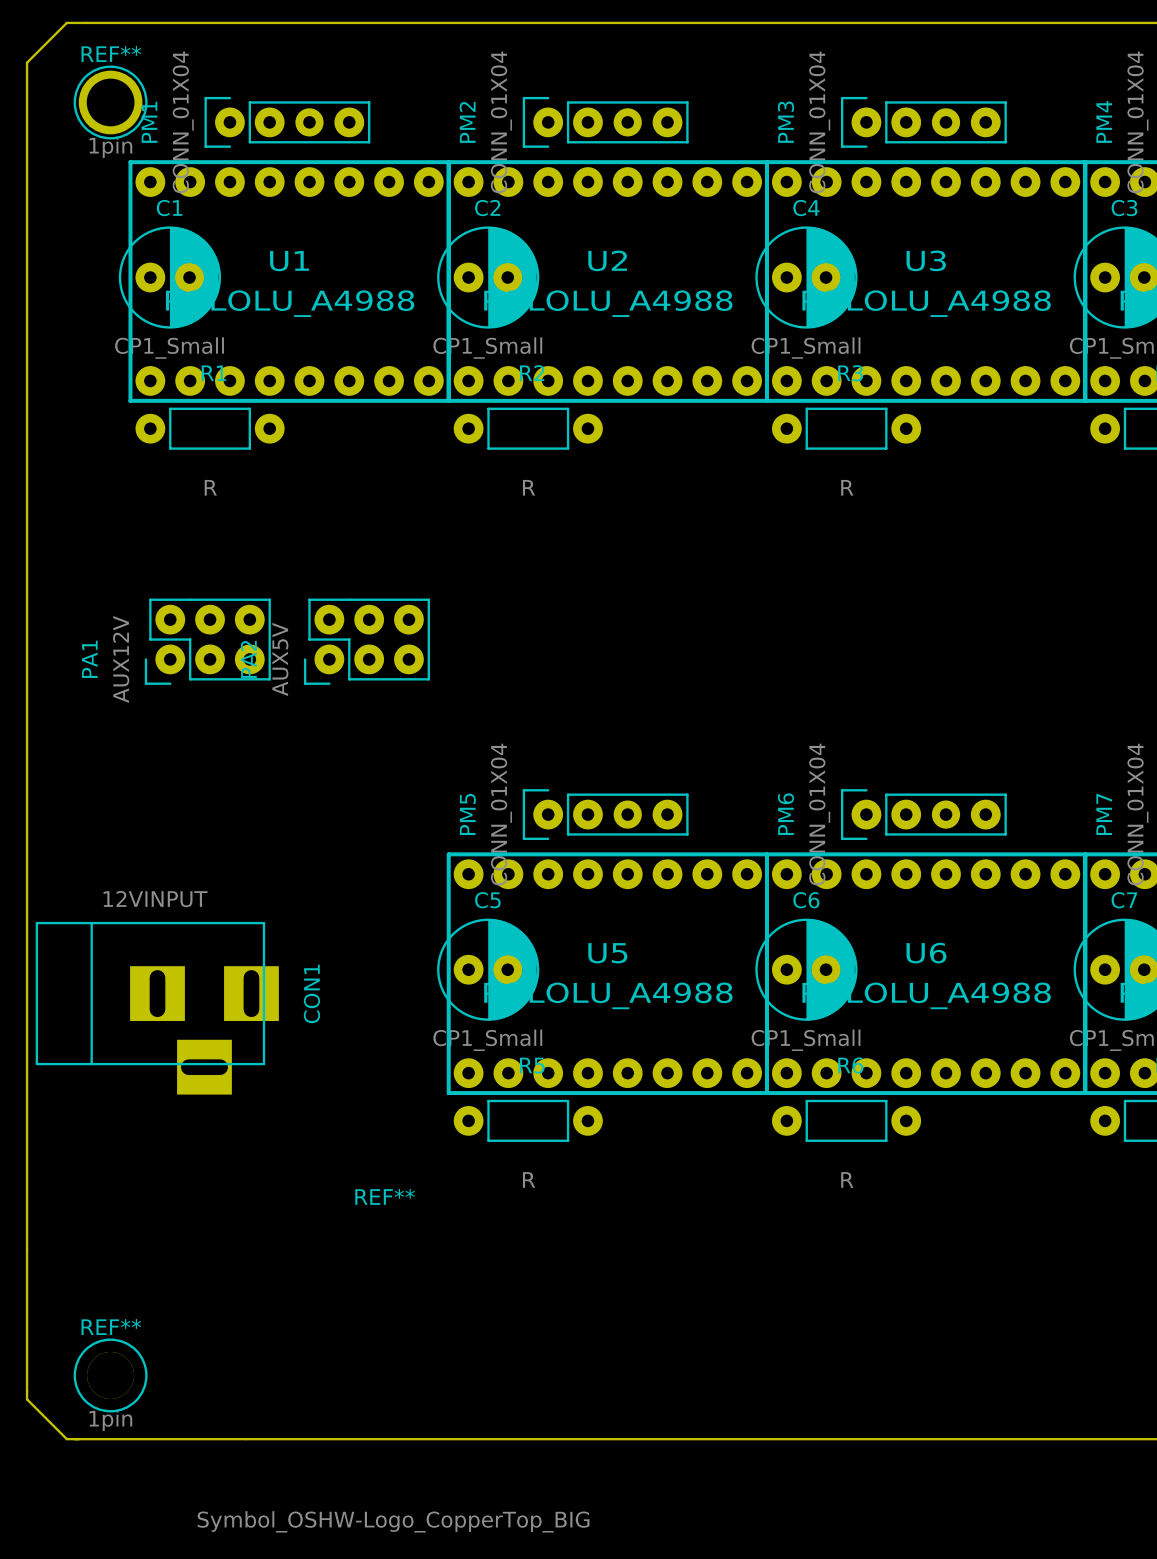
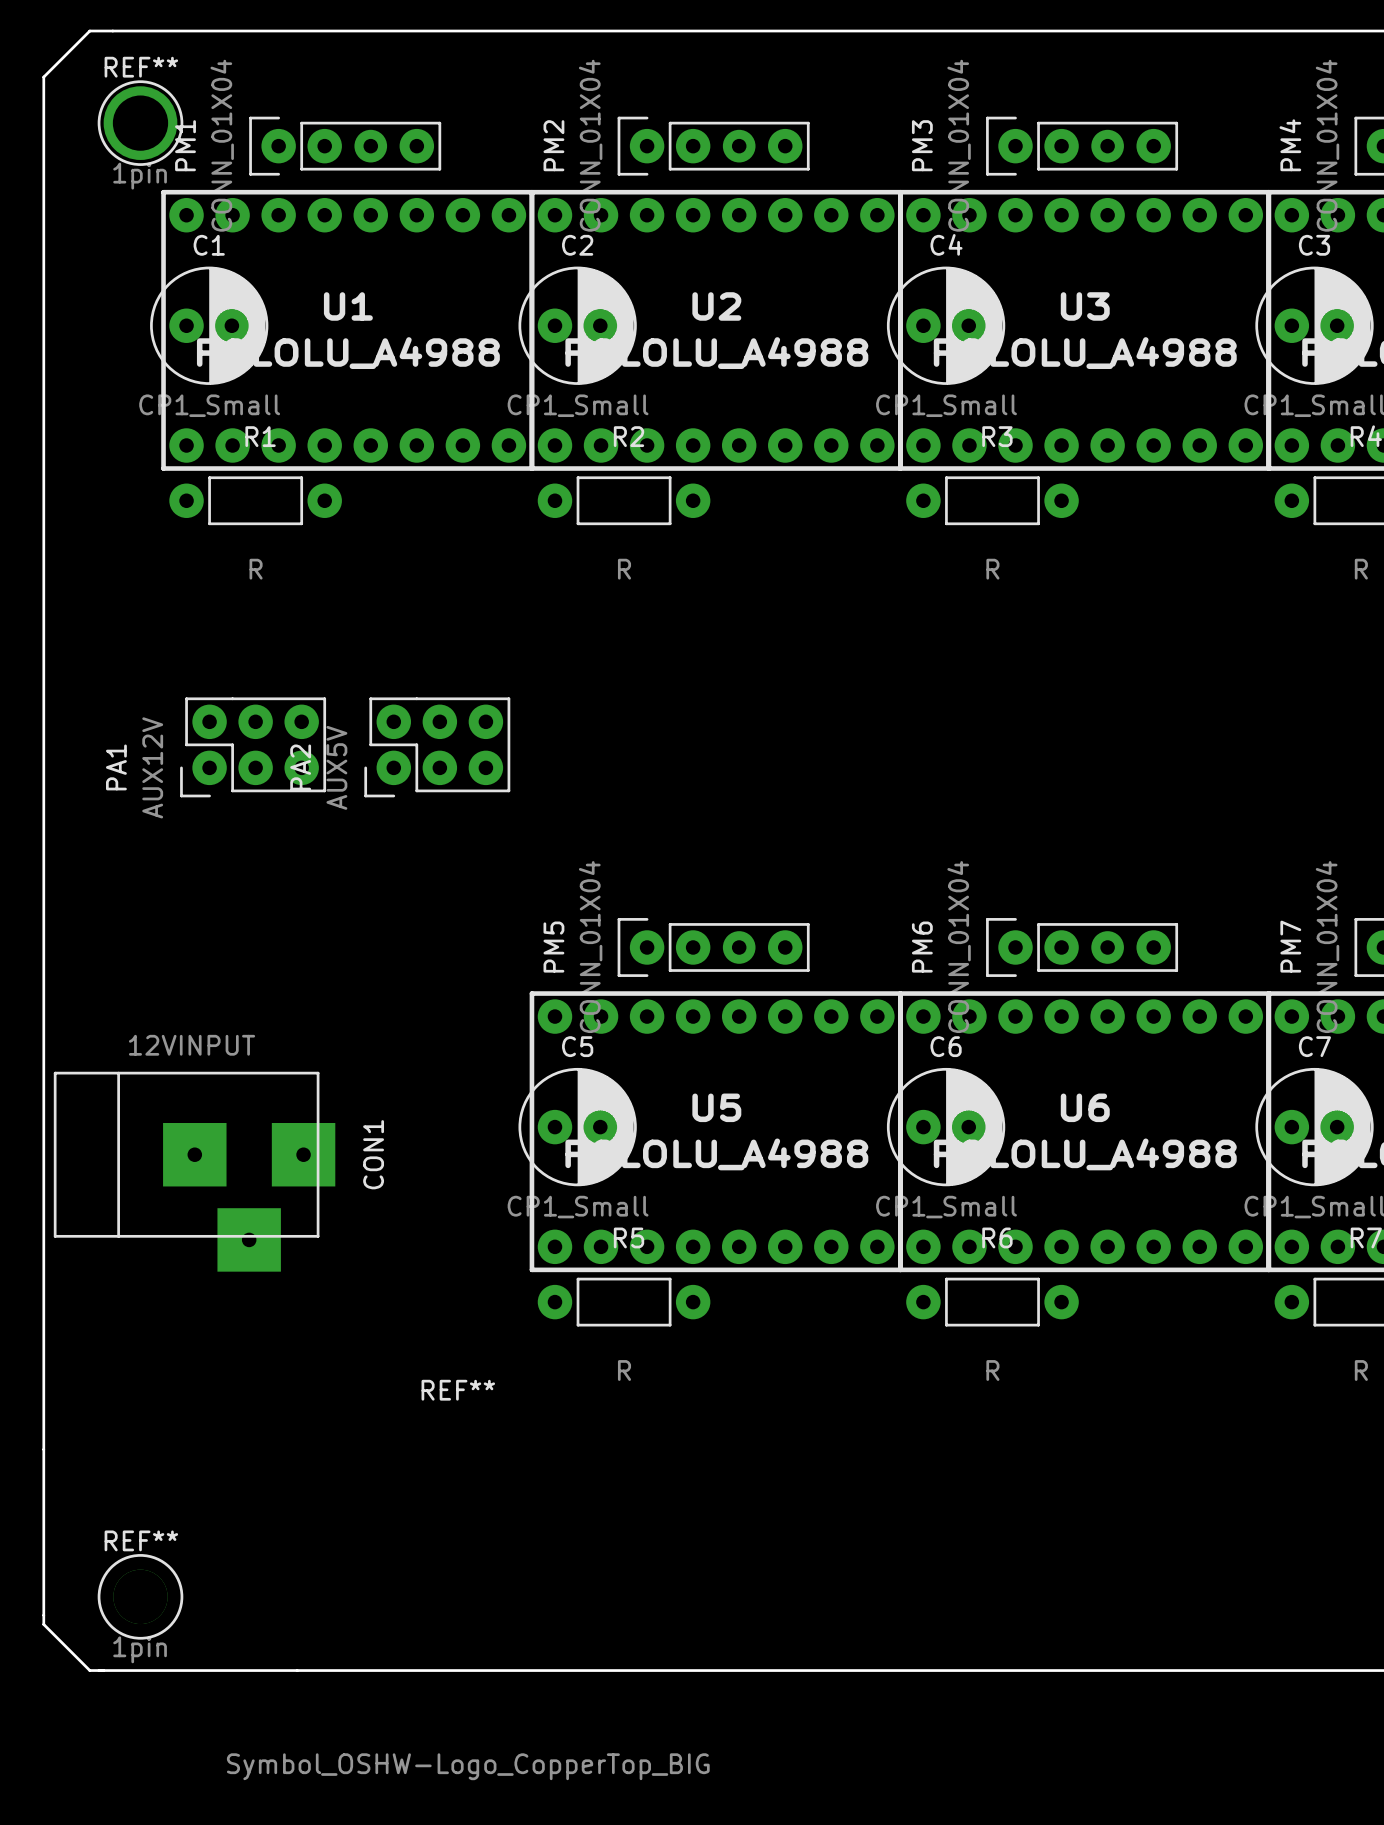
CON1 footprint: [35, 921, 279, 1095] -> [53, 1071, 336, 1272]

